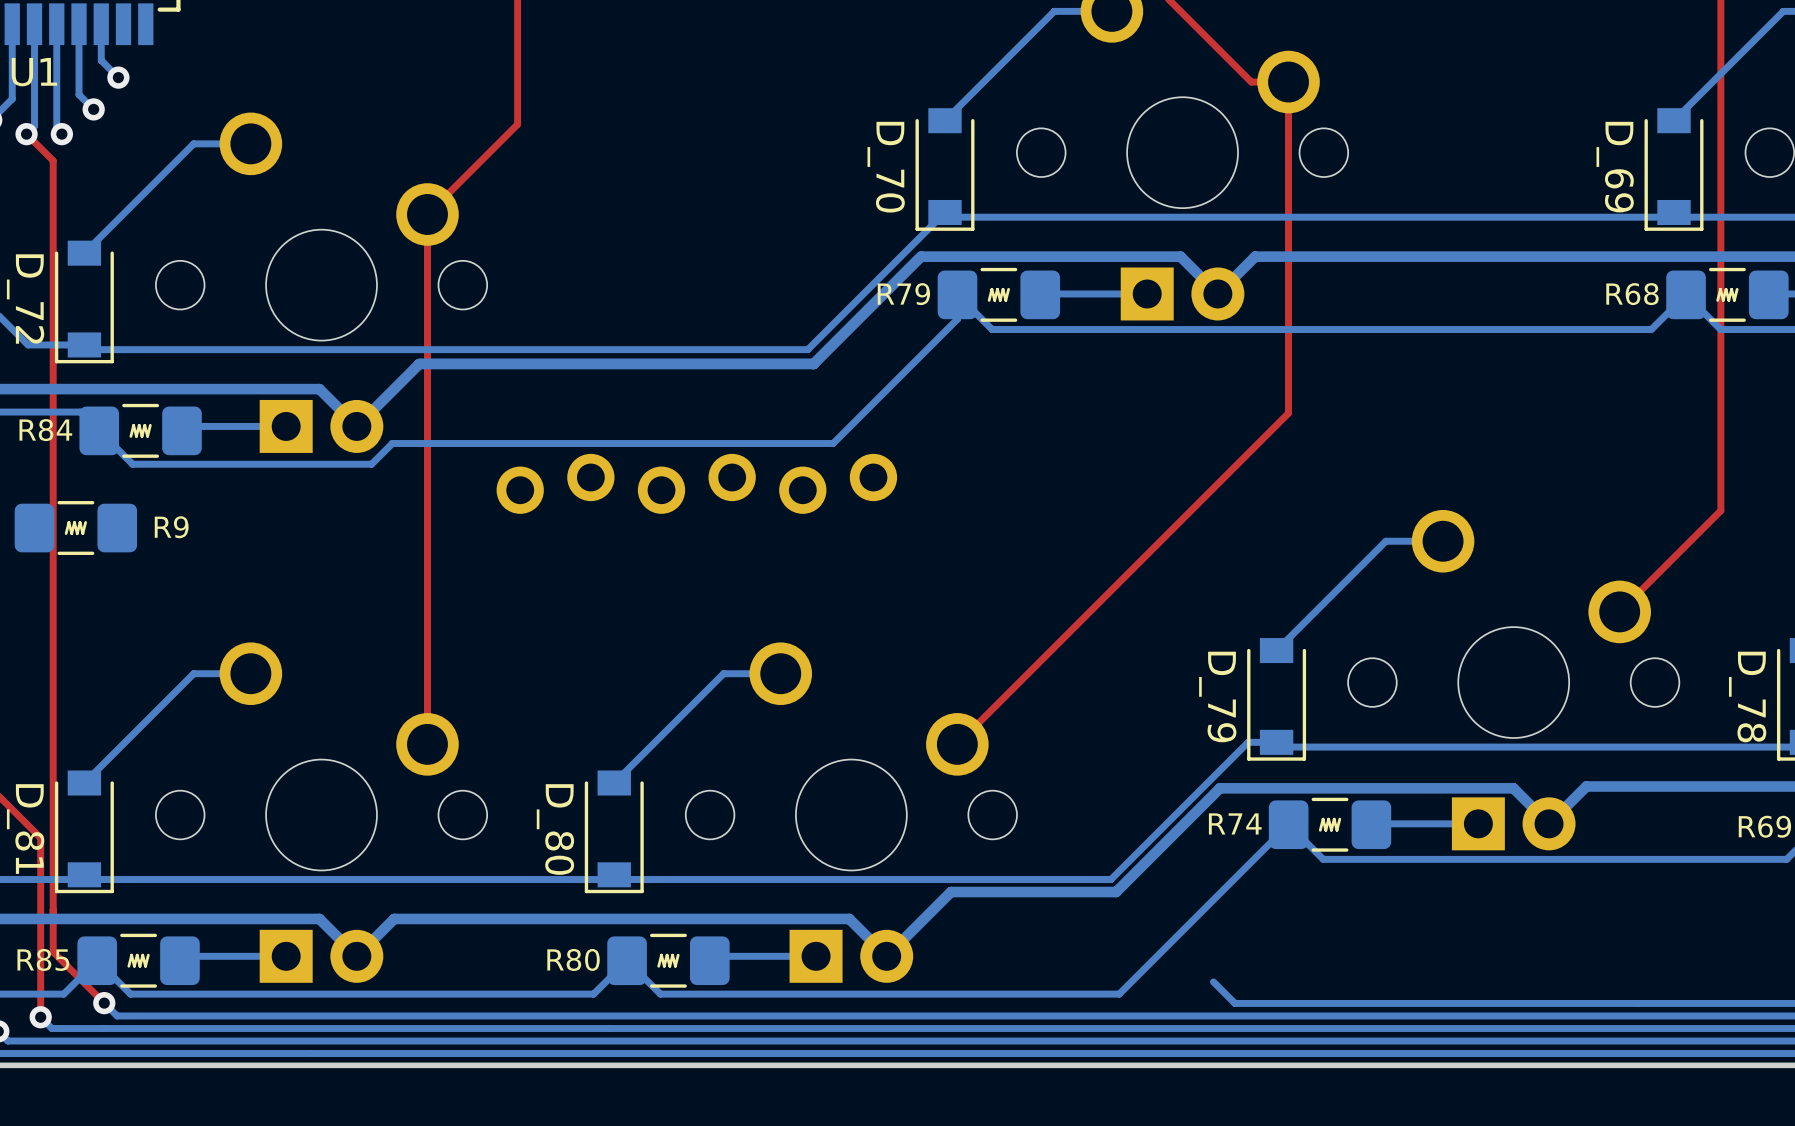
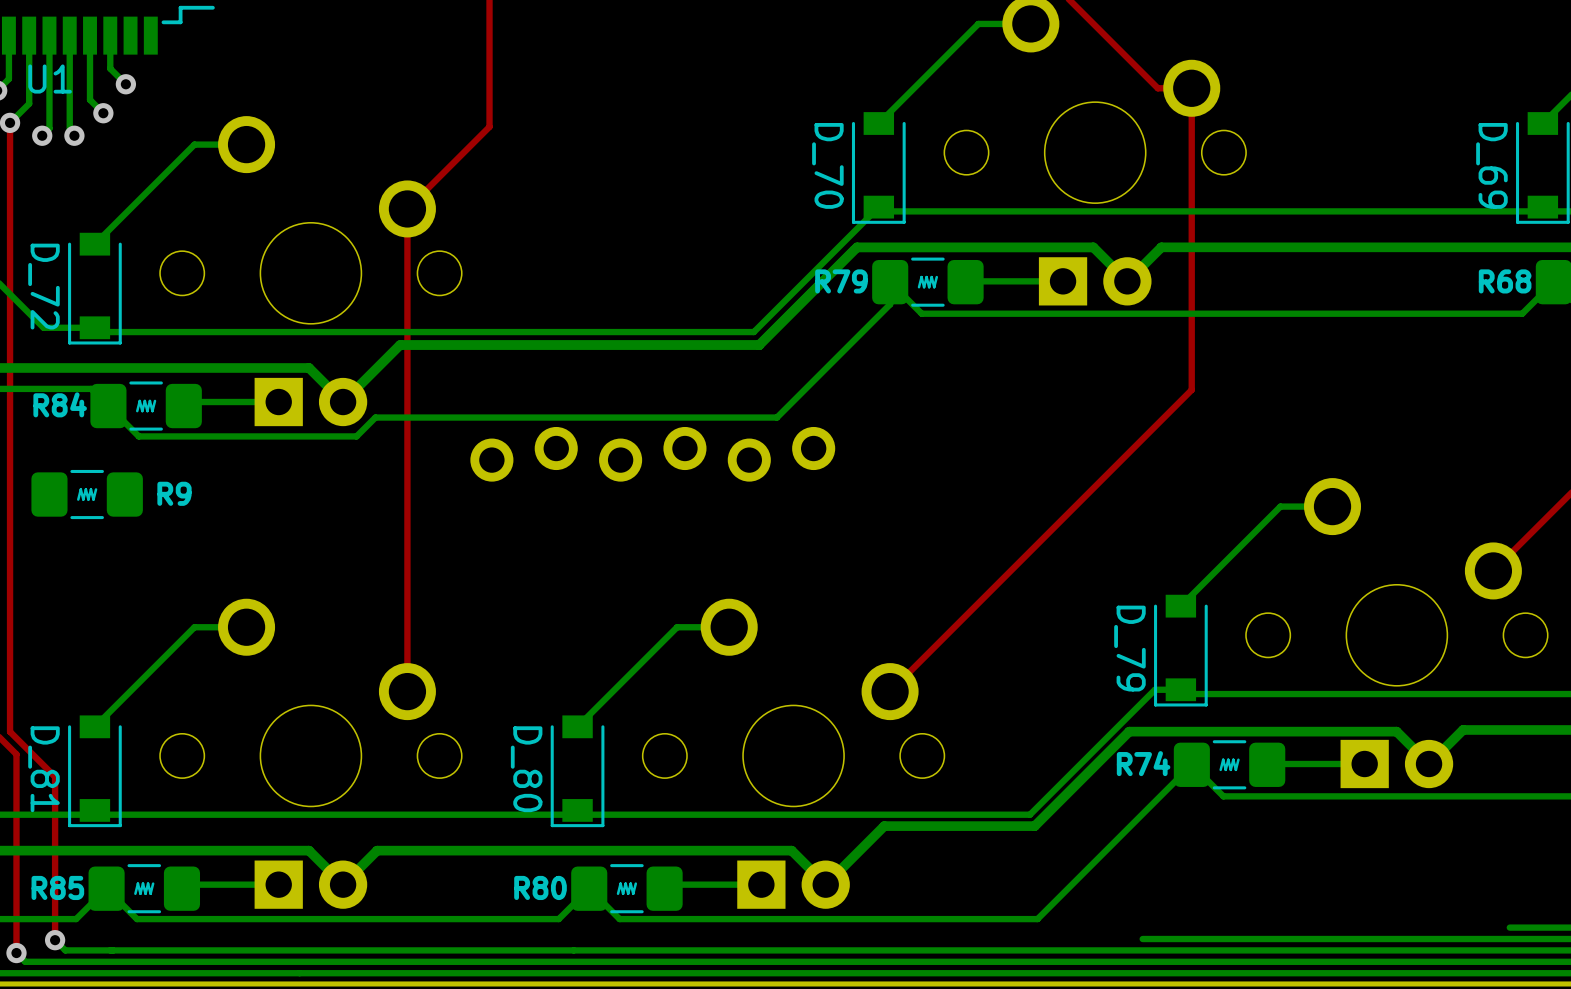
top track: (26, 134) (53, 160) (53, 952) (104, 1003) -> none
bottom track: (1213, 981) (1234, 1003) (1637, 1003) -> none
bottom track: (104, 1003) (117, 1015) (1234, 1015) -> none
via: (104, 1003) -> none

